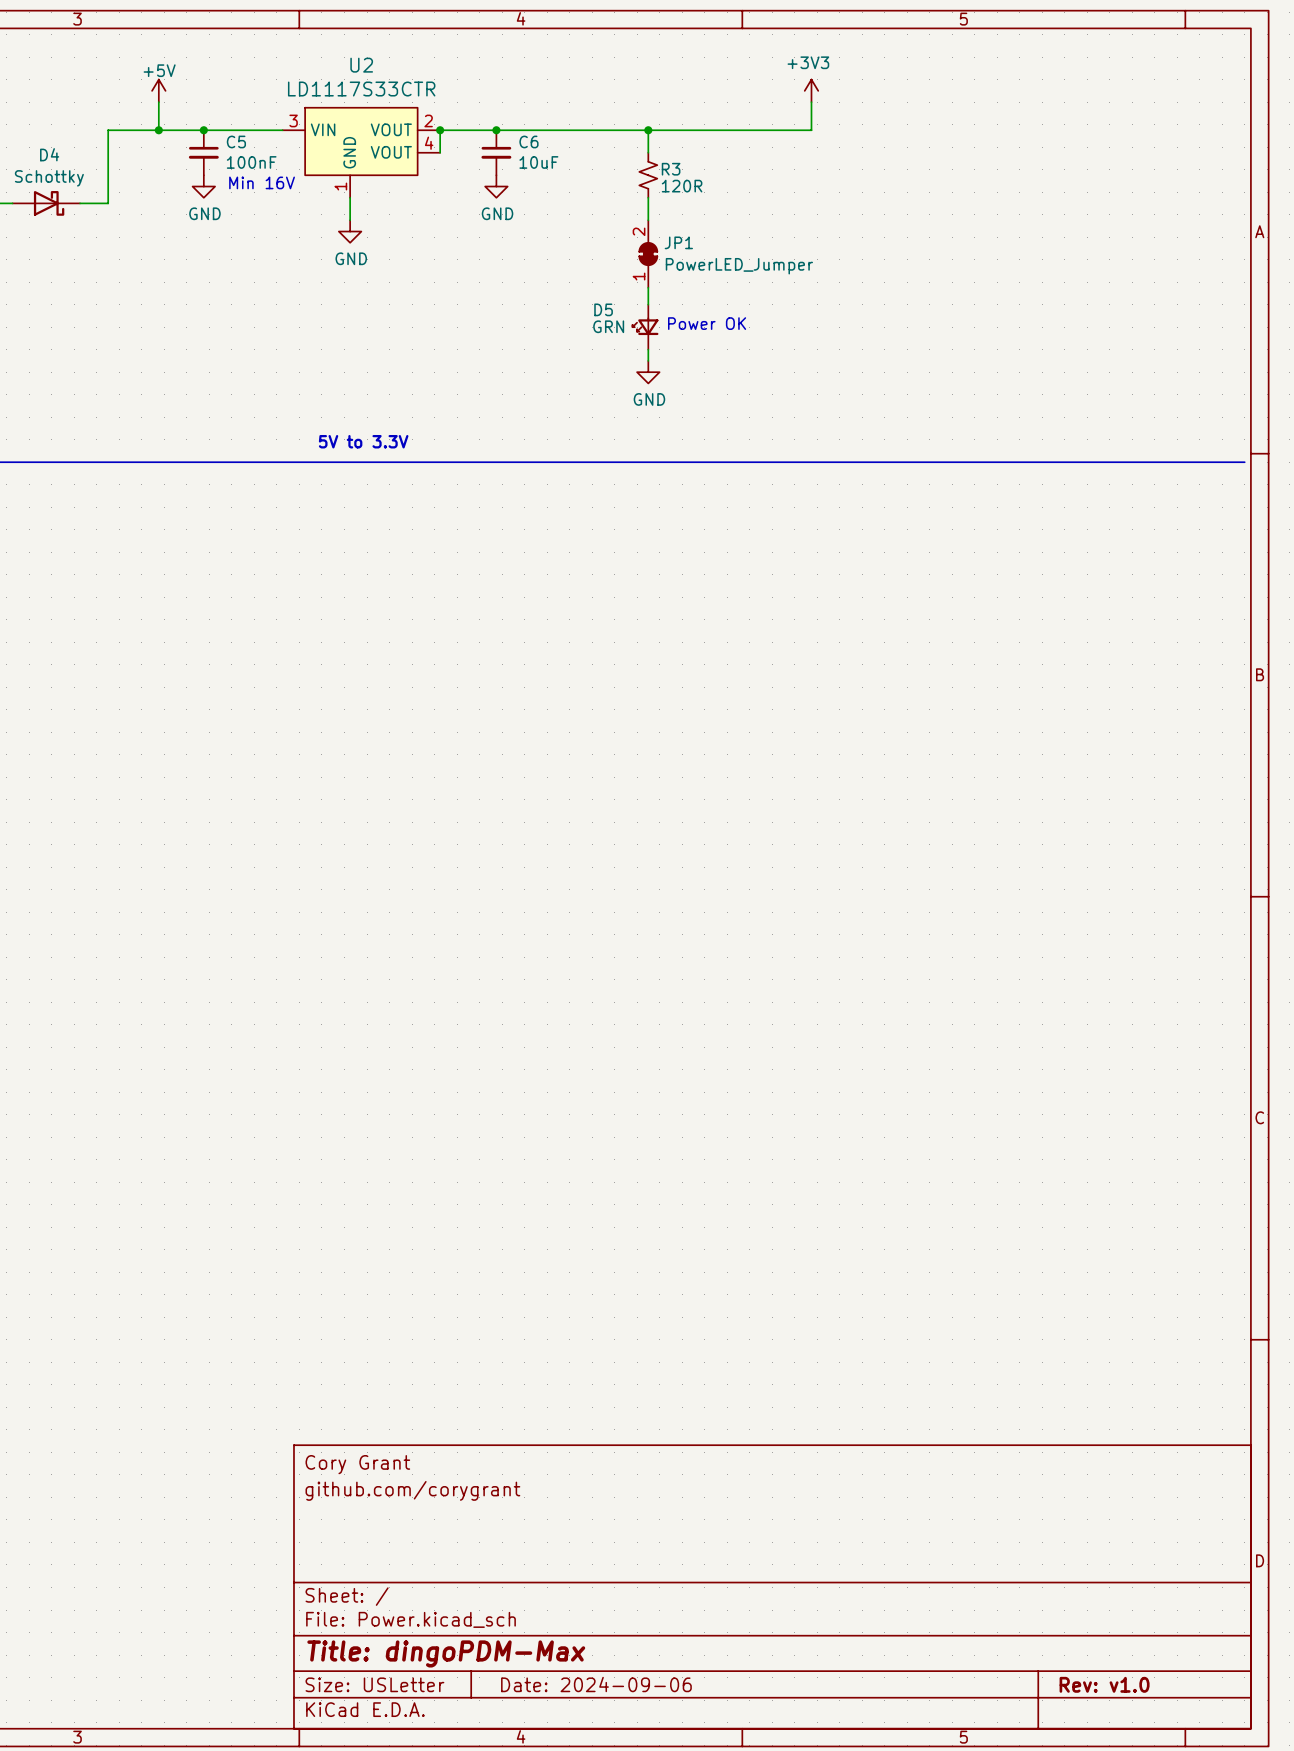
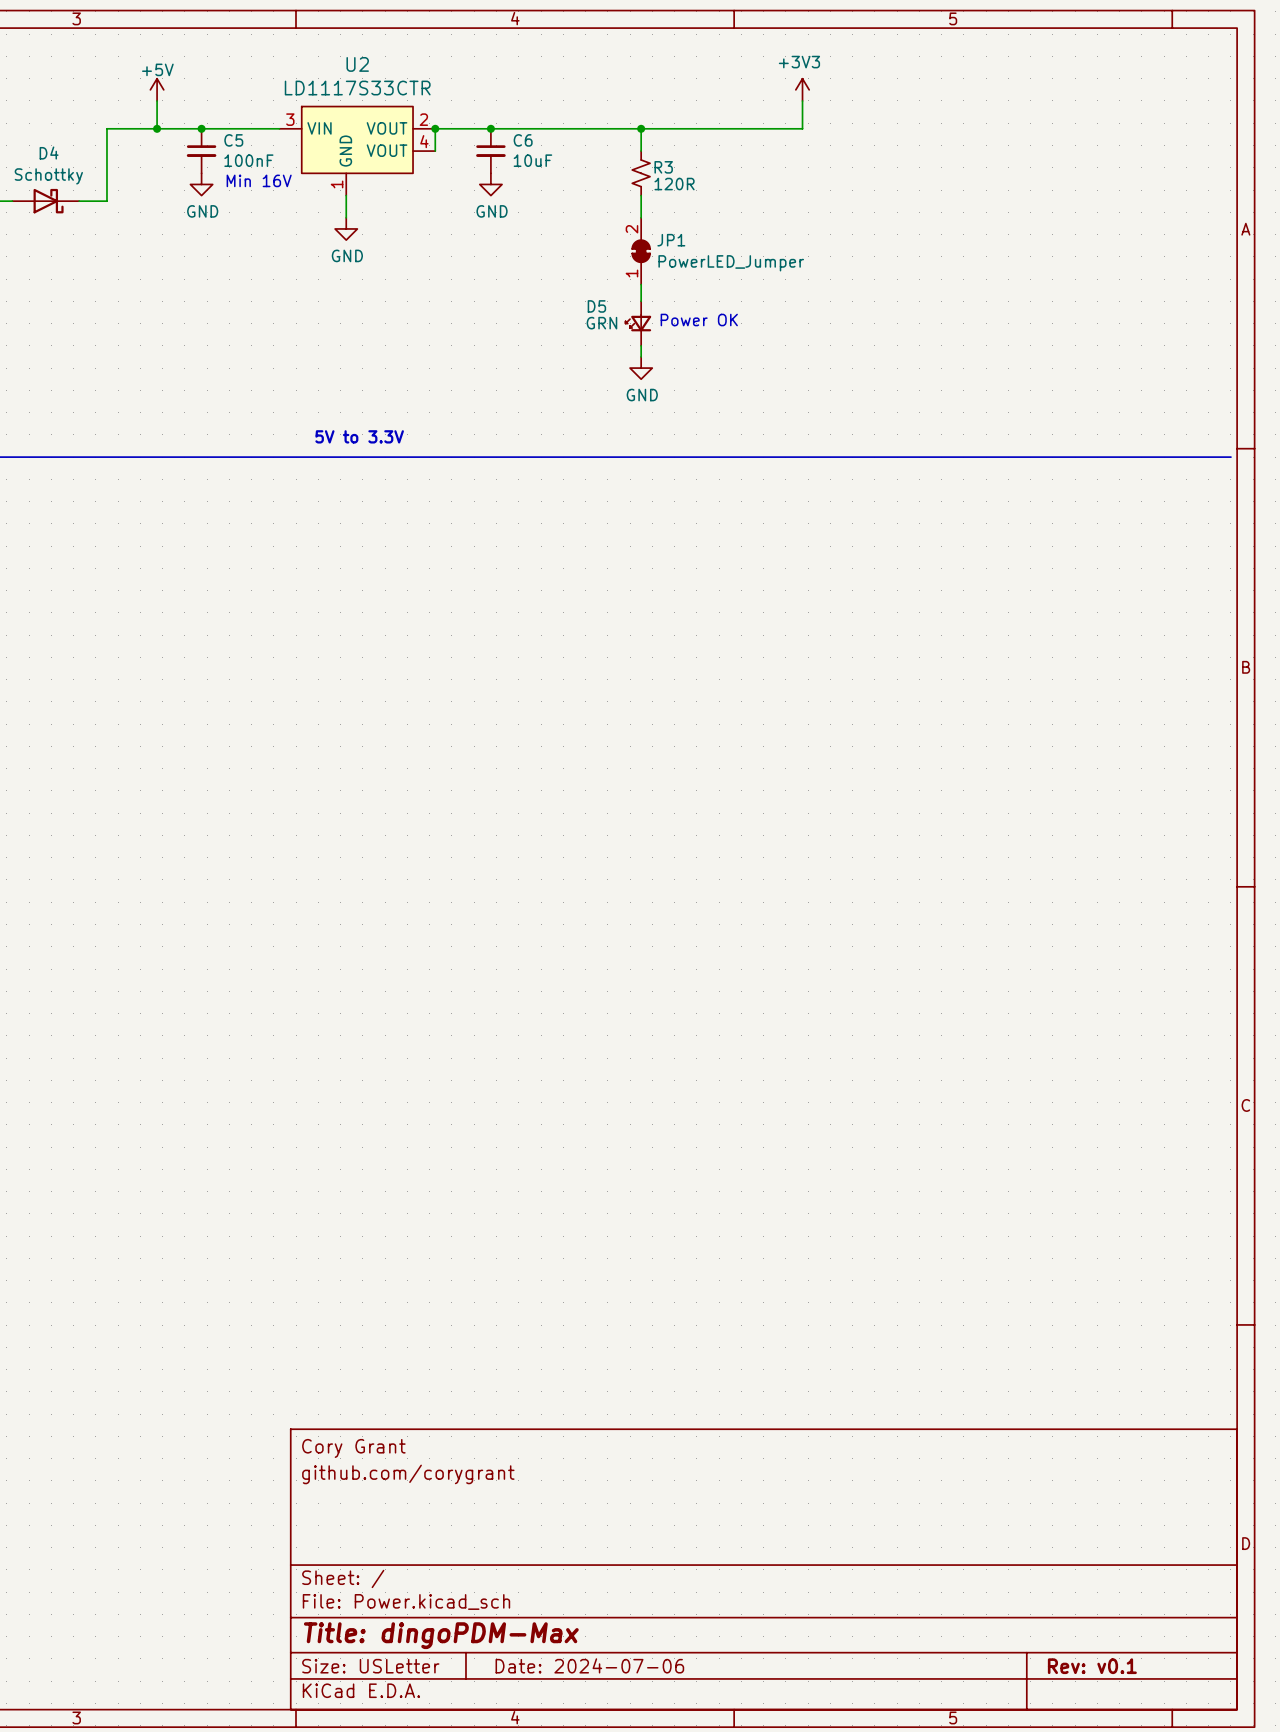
title block: Date: 2024-09-06 (596, 1684) -> Date: 2024-07-06 (589, 1665)
title block: Rev: v1.0 (1104, 1684) -> Rev: v0.1 (1092, 1666)

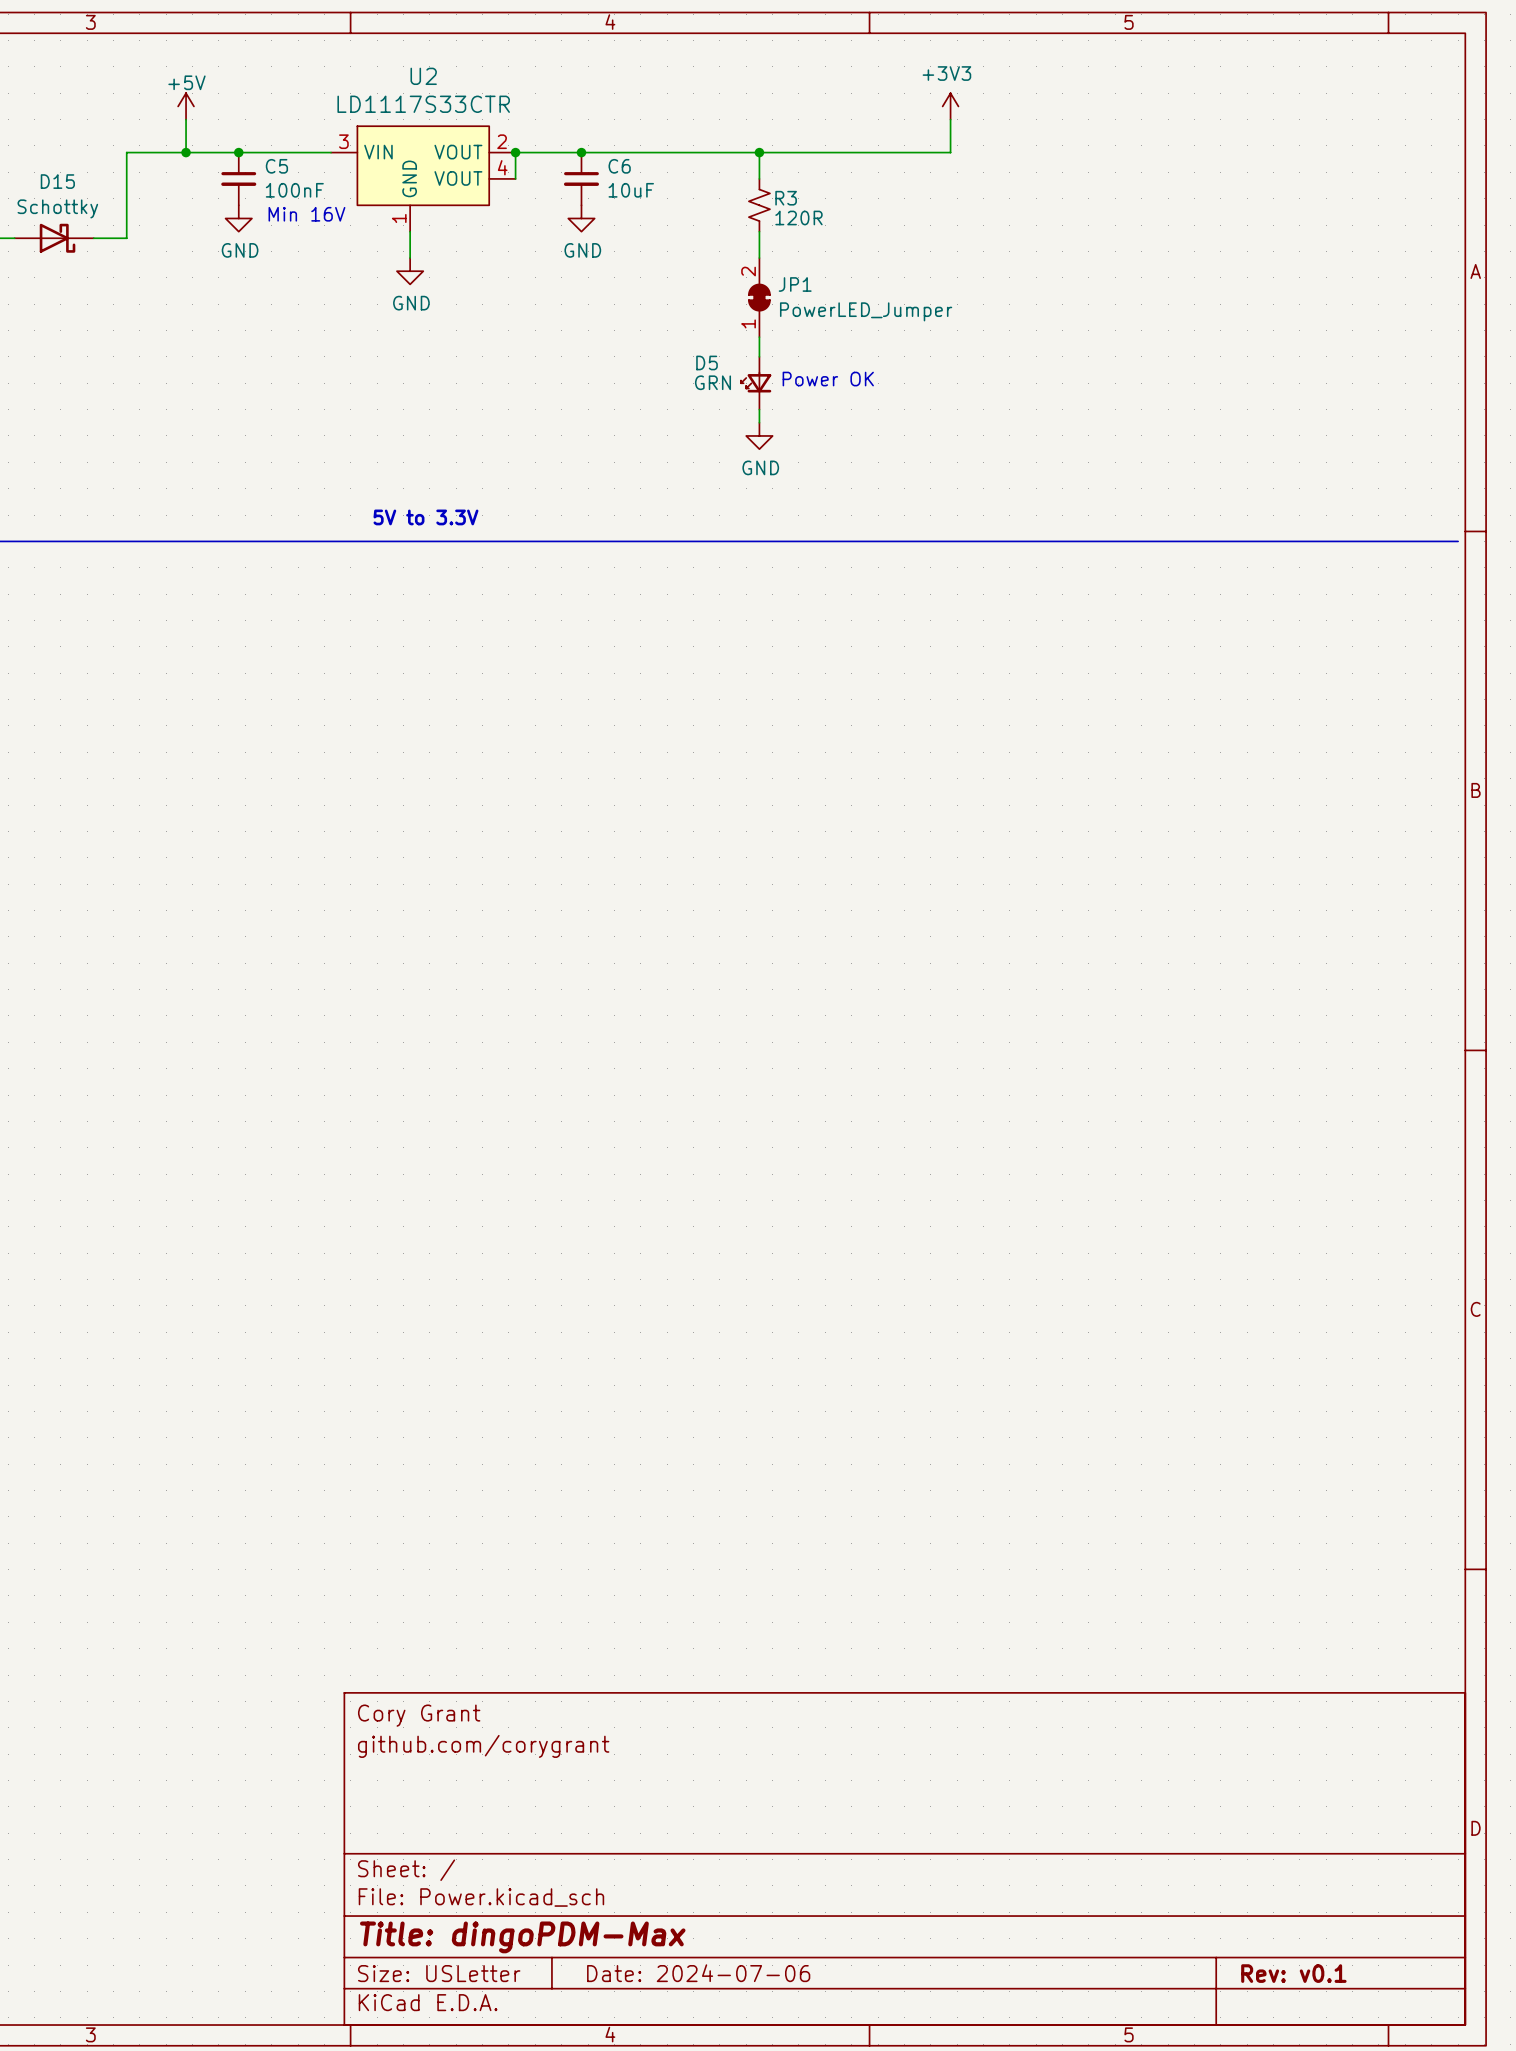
D4 name: D4 (49, 153) -> D15 (57, 181)

